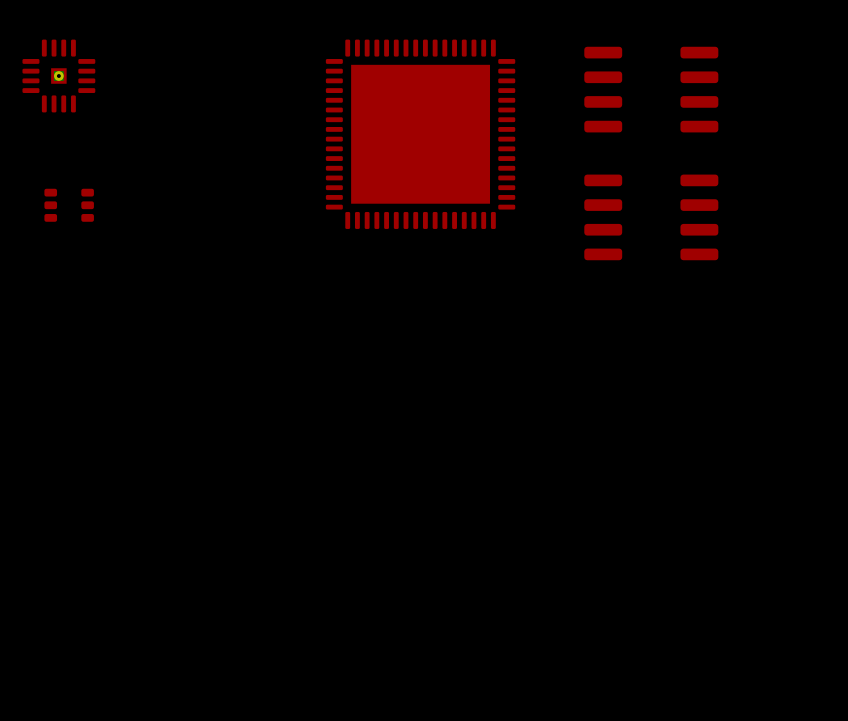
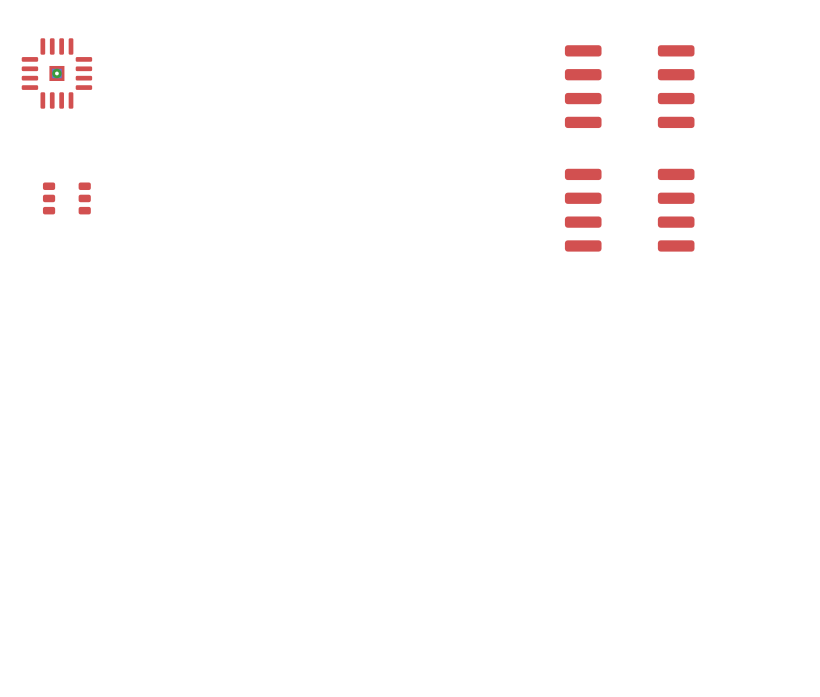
part: (420, 134) -> none

